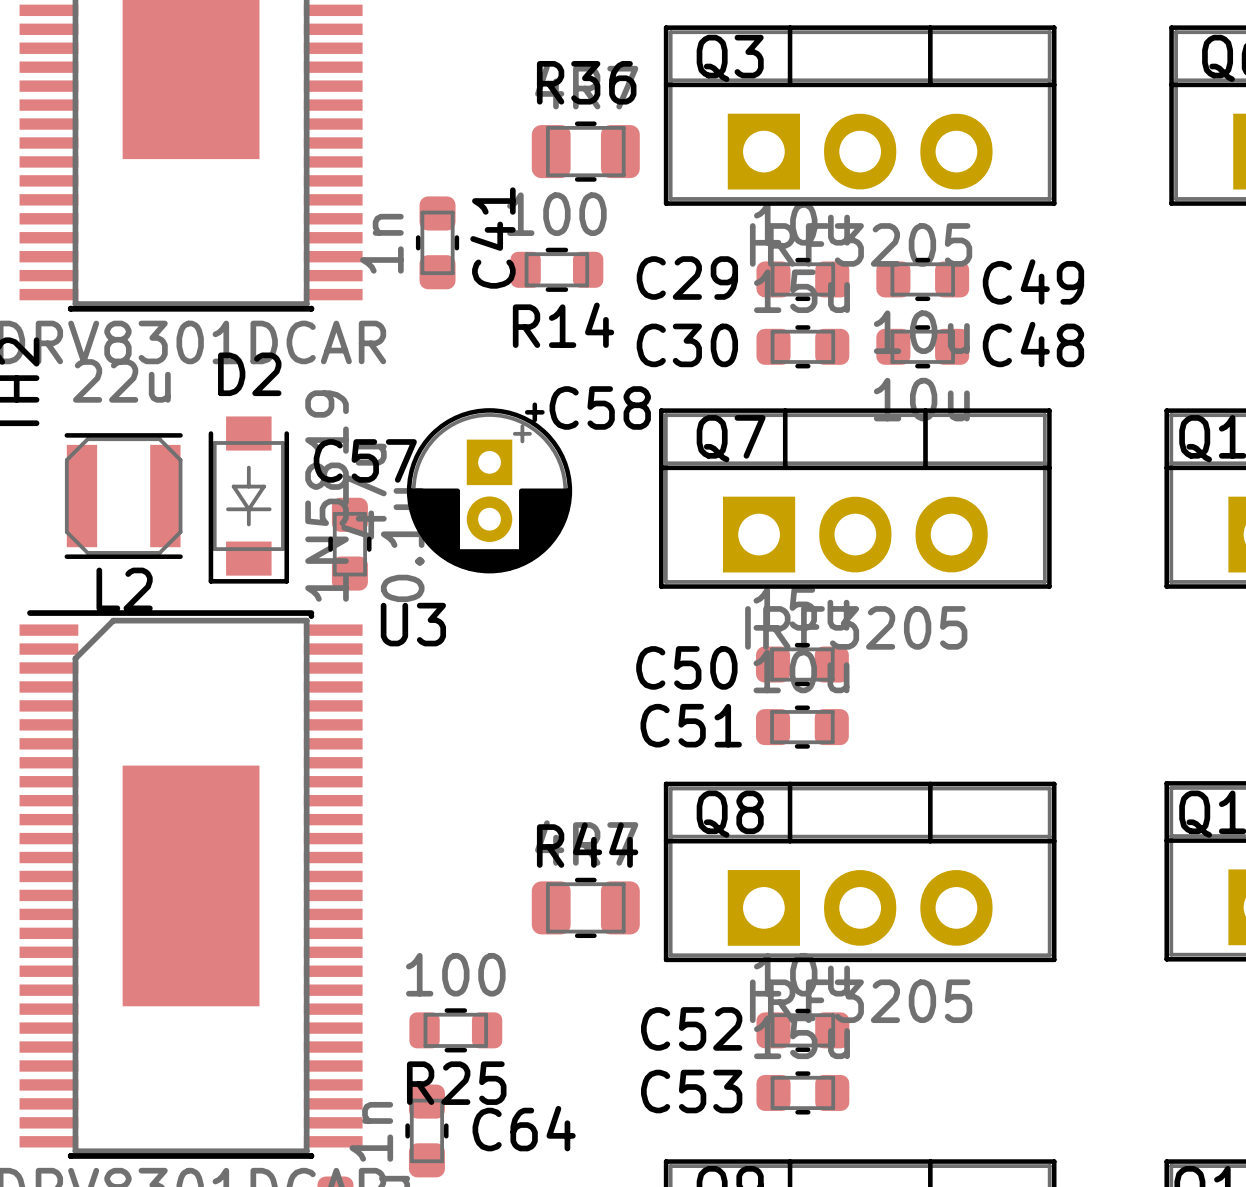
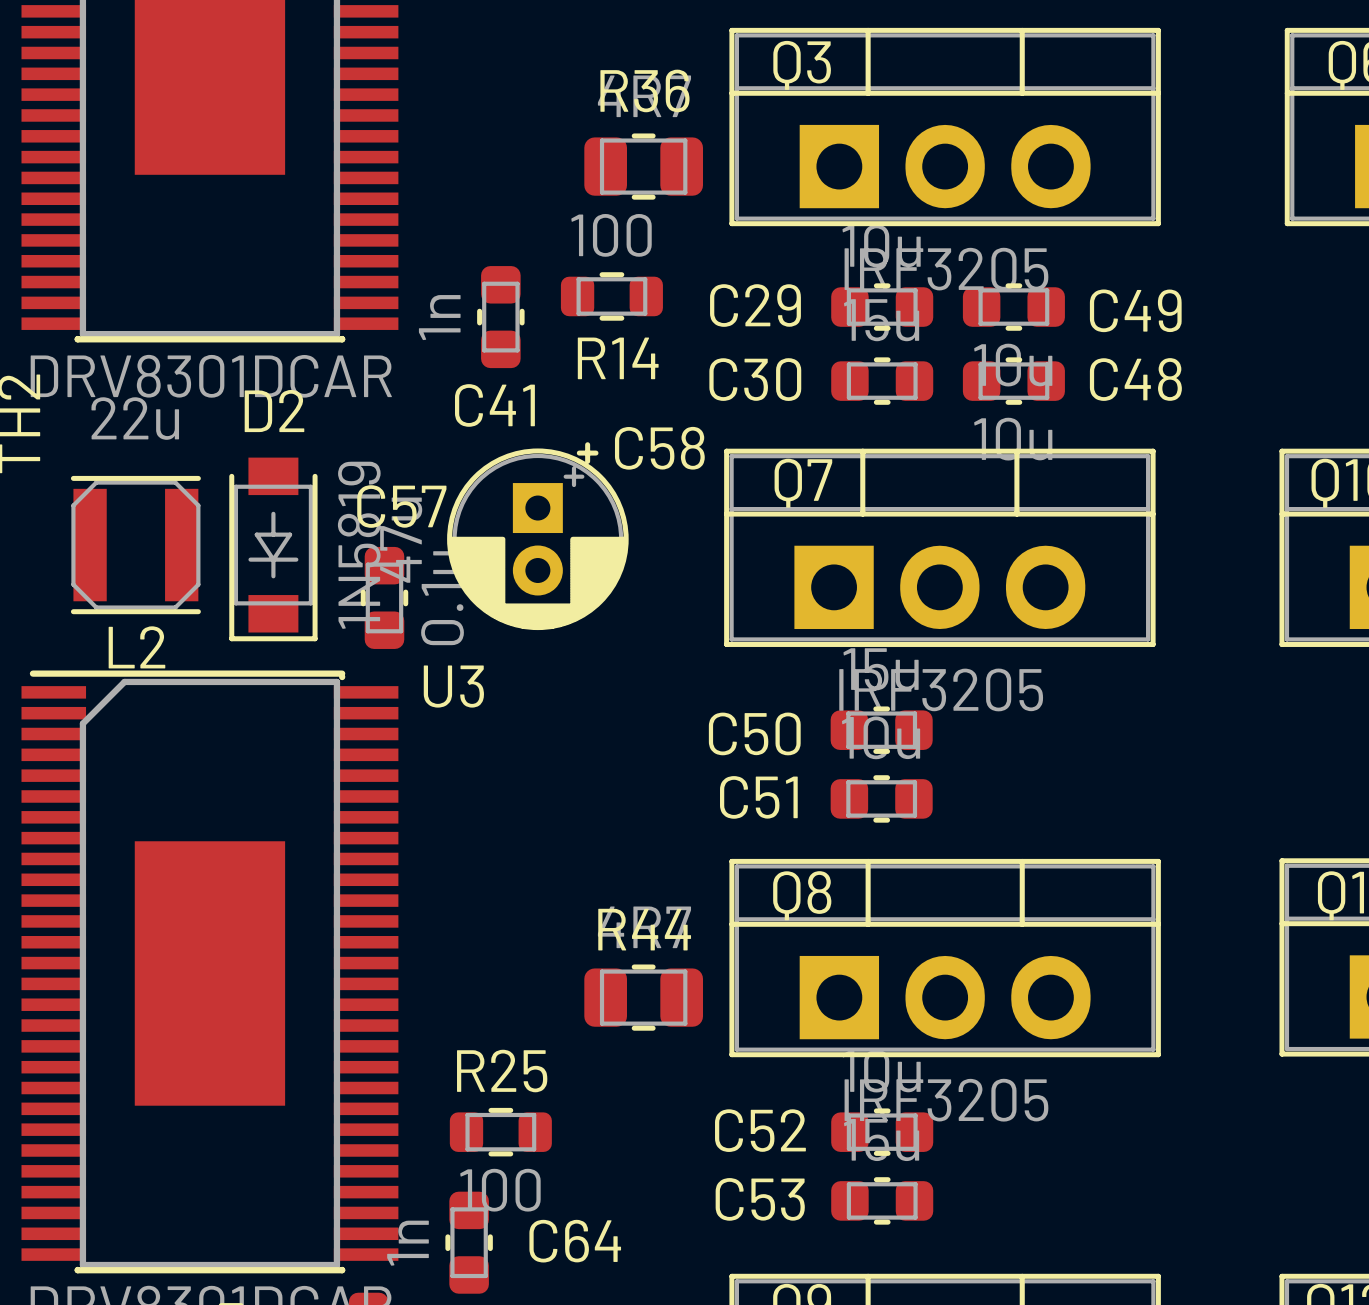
C41 name rotation: 0° (492, 238) -> 90° clockwise (494, 405)
C41 position: (437, 242) -> (500, 317)
R25 value position: 100 (455, 974) -> 100 (500, 1190)
R25 name position: R25 (456, 1083) -> R25 (502, 1071)

